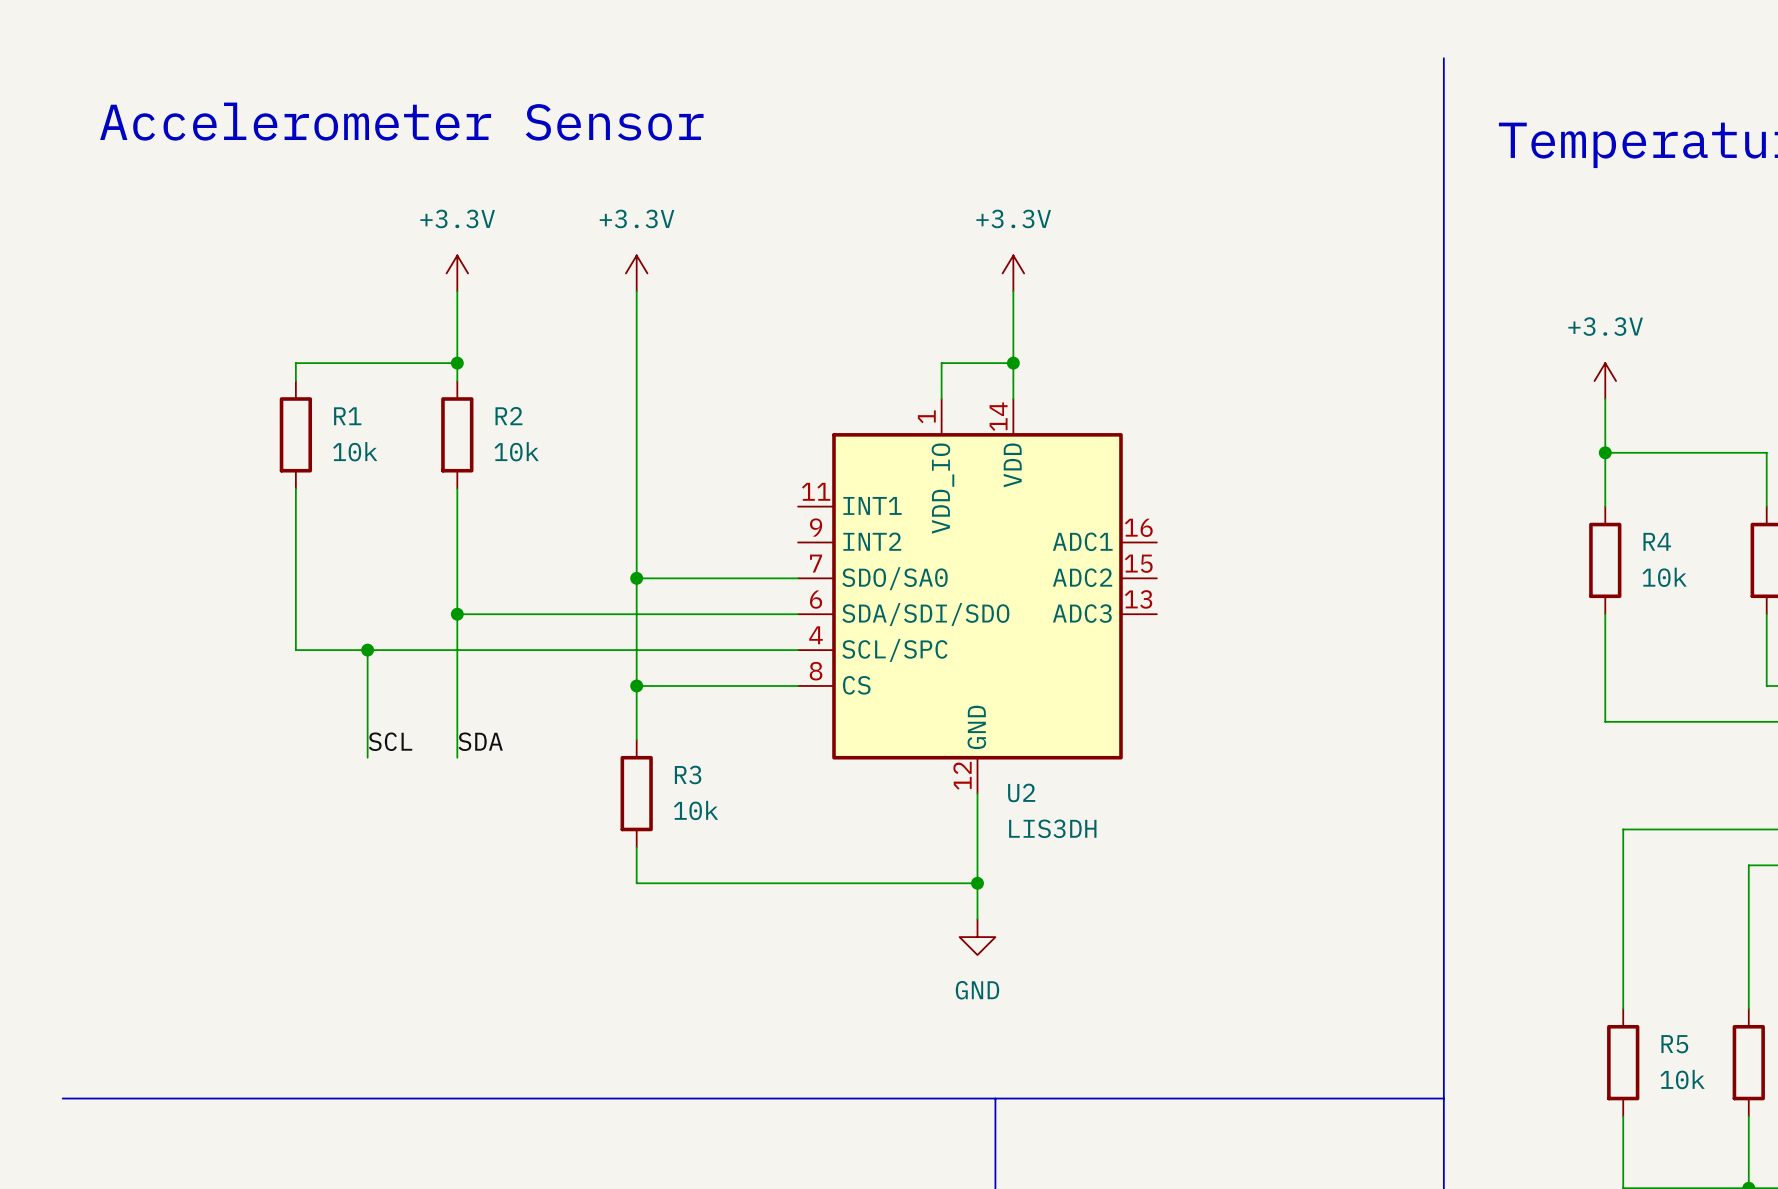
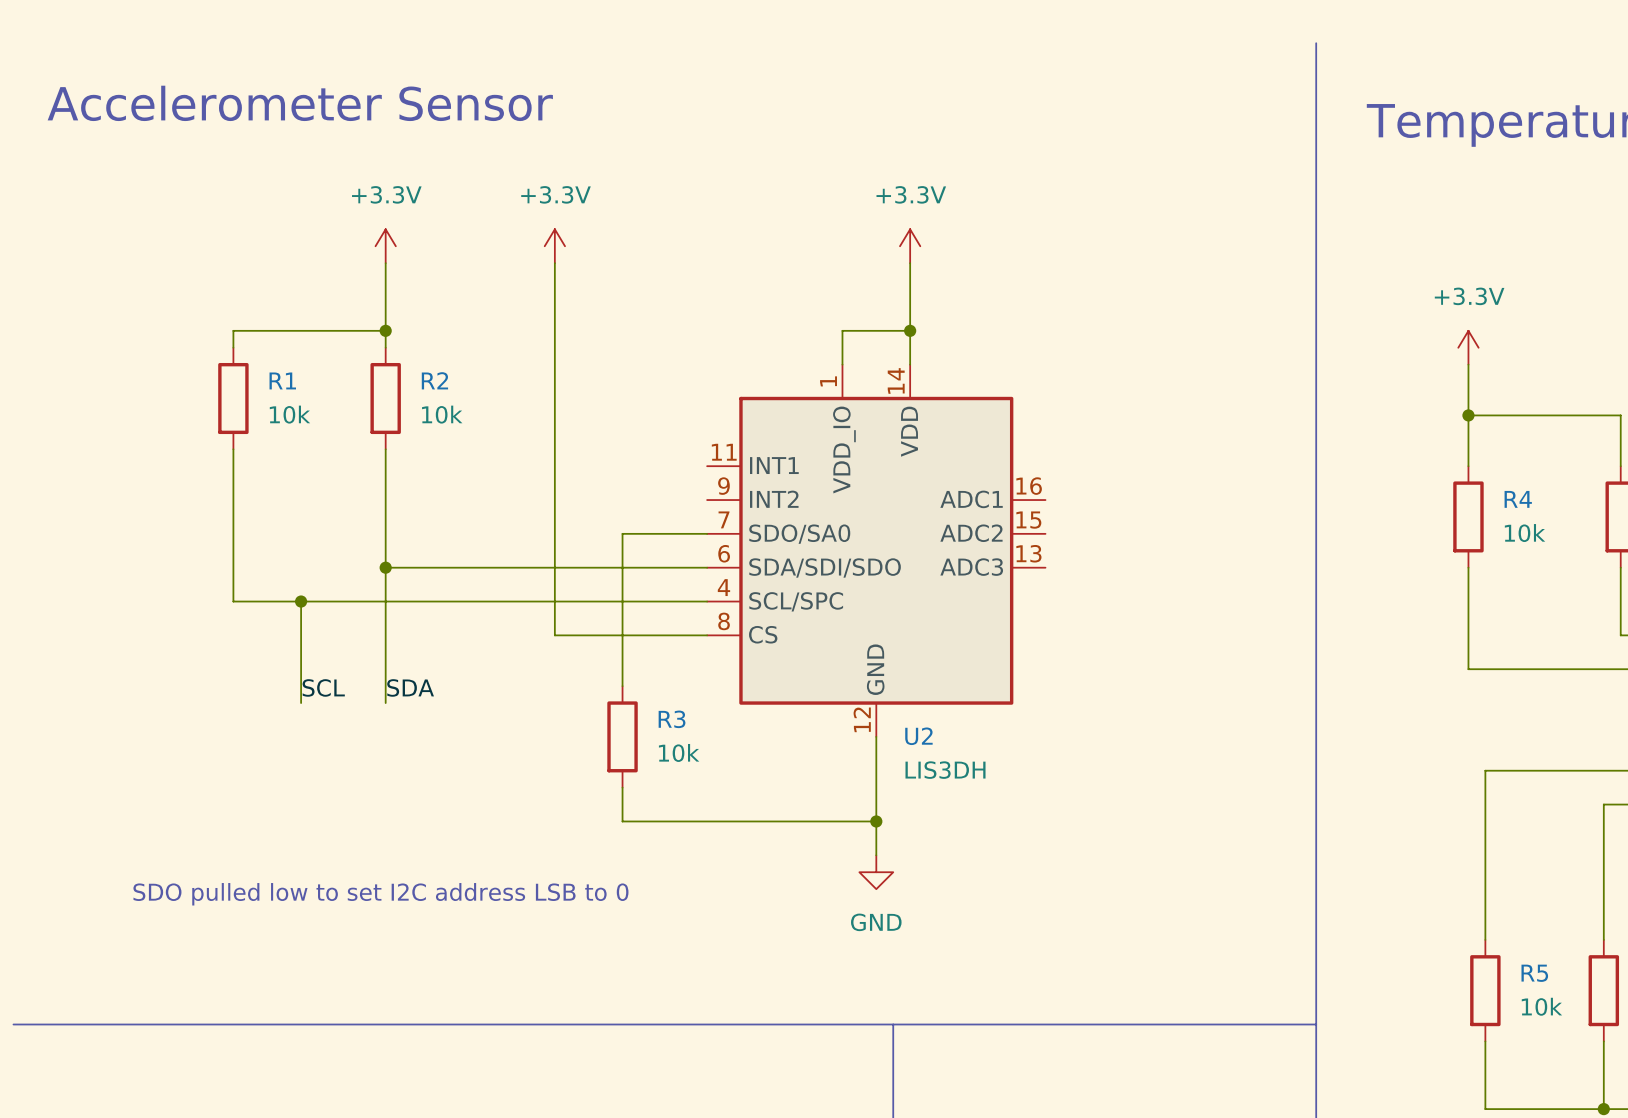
wire: (636, 578) (708, 578) -> (622, 686) (622, 533)
junction: (636, 578) -> none
wire: (636, 685) (636, 739) -> none
junction: (636, 685) -> none
R3 position: (636, 793) -> (622, 736)
wire: (636, 847) (636, 883) (708, 883) -> (622, 787) (622, 821)
text: none -> SDO pulled low to set I2C address LSB to 0 (380, 894)

